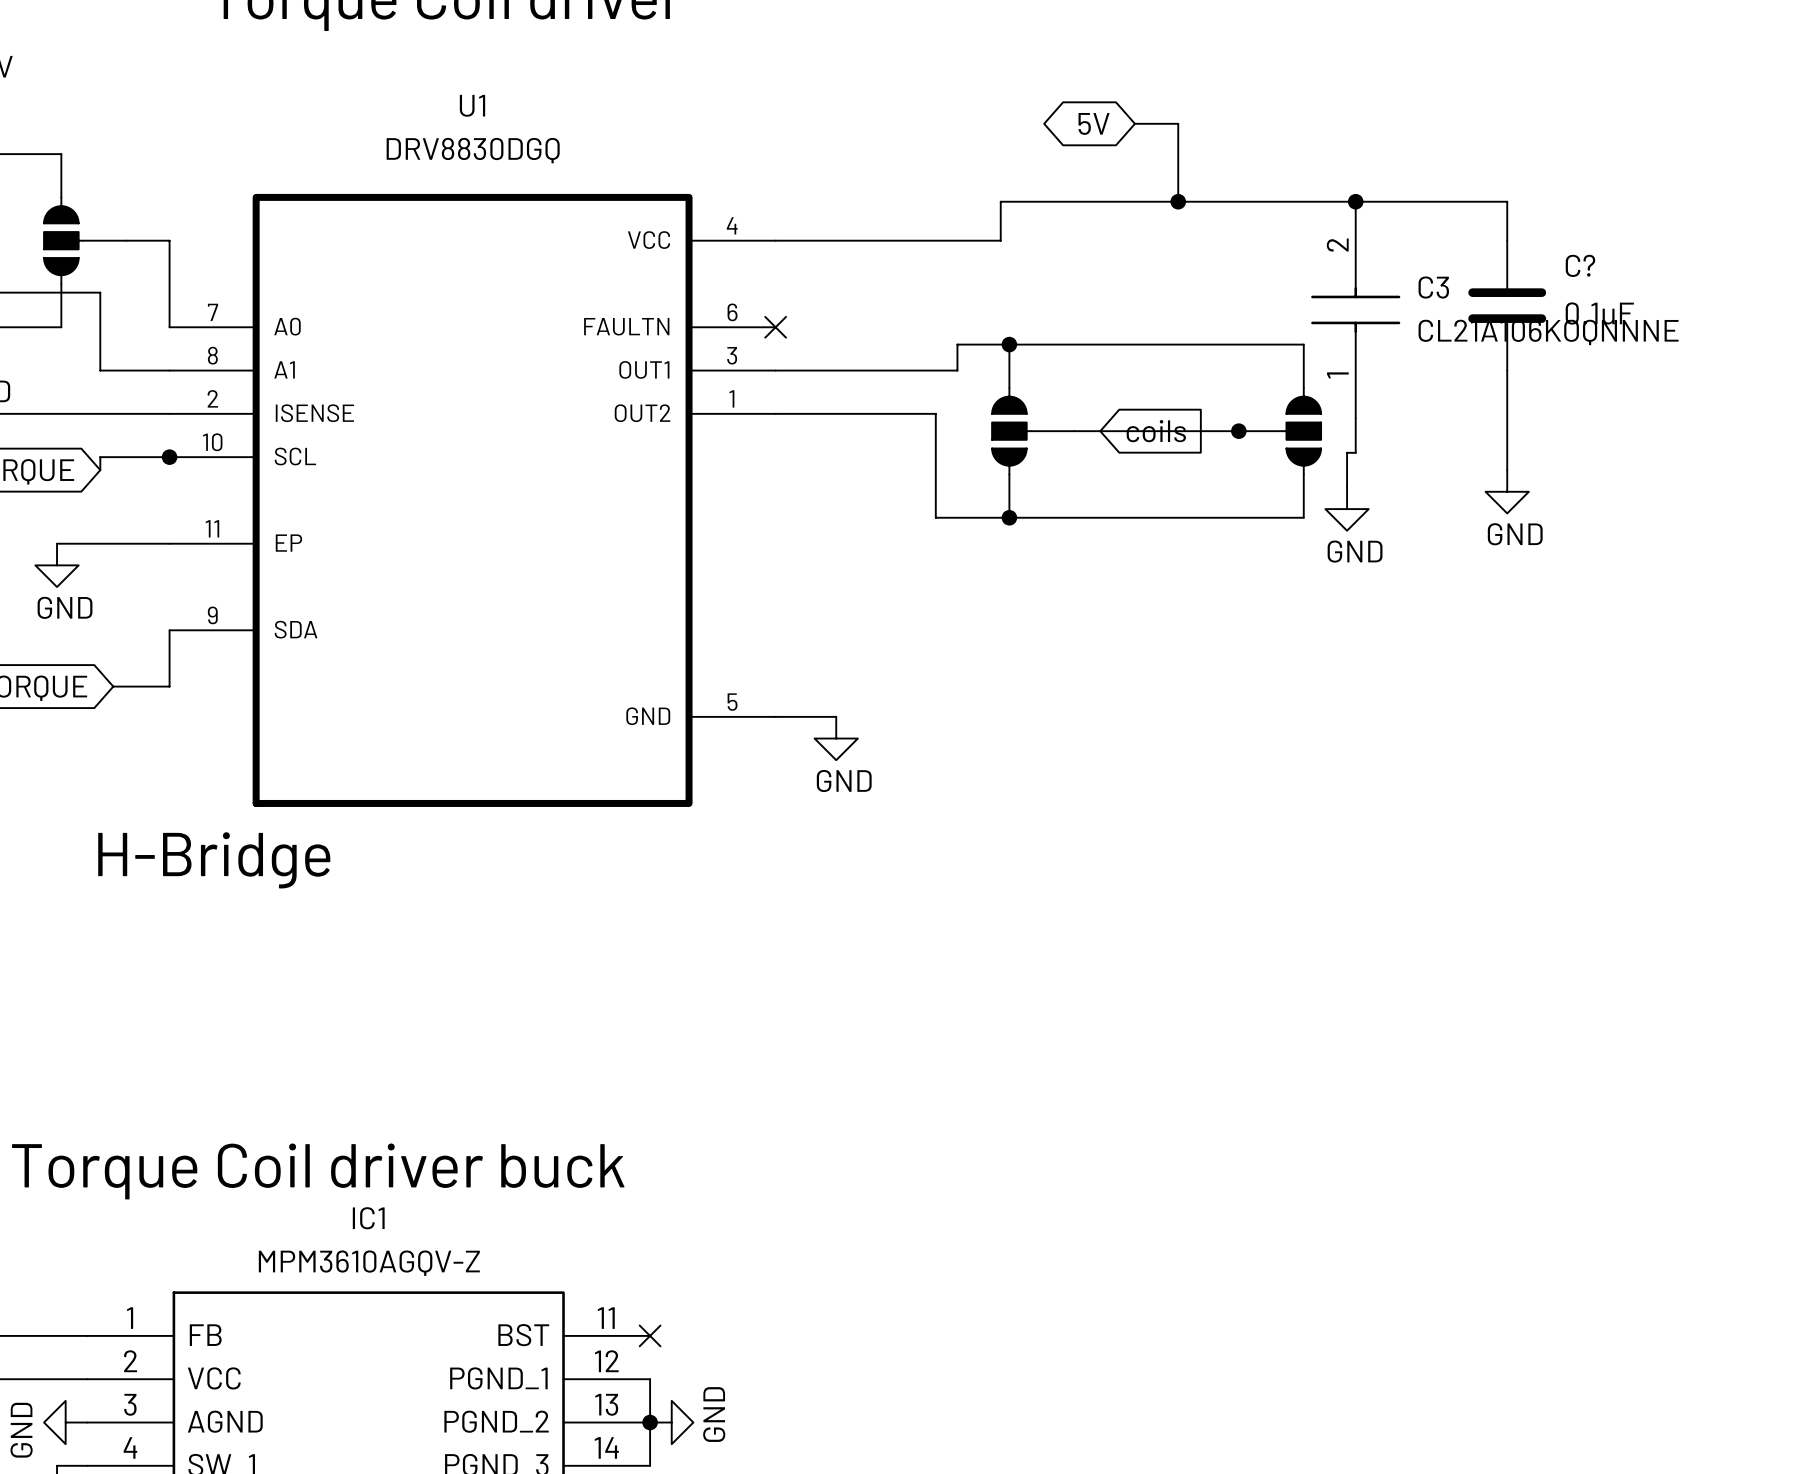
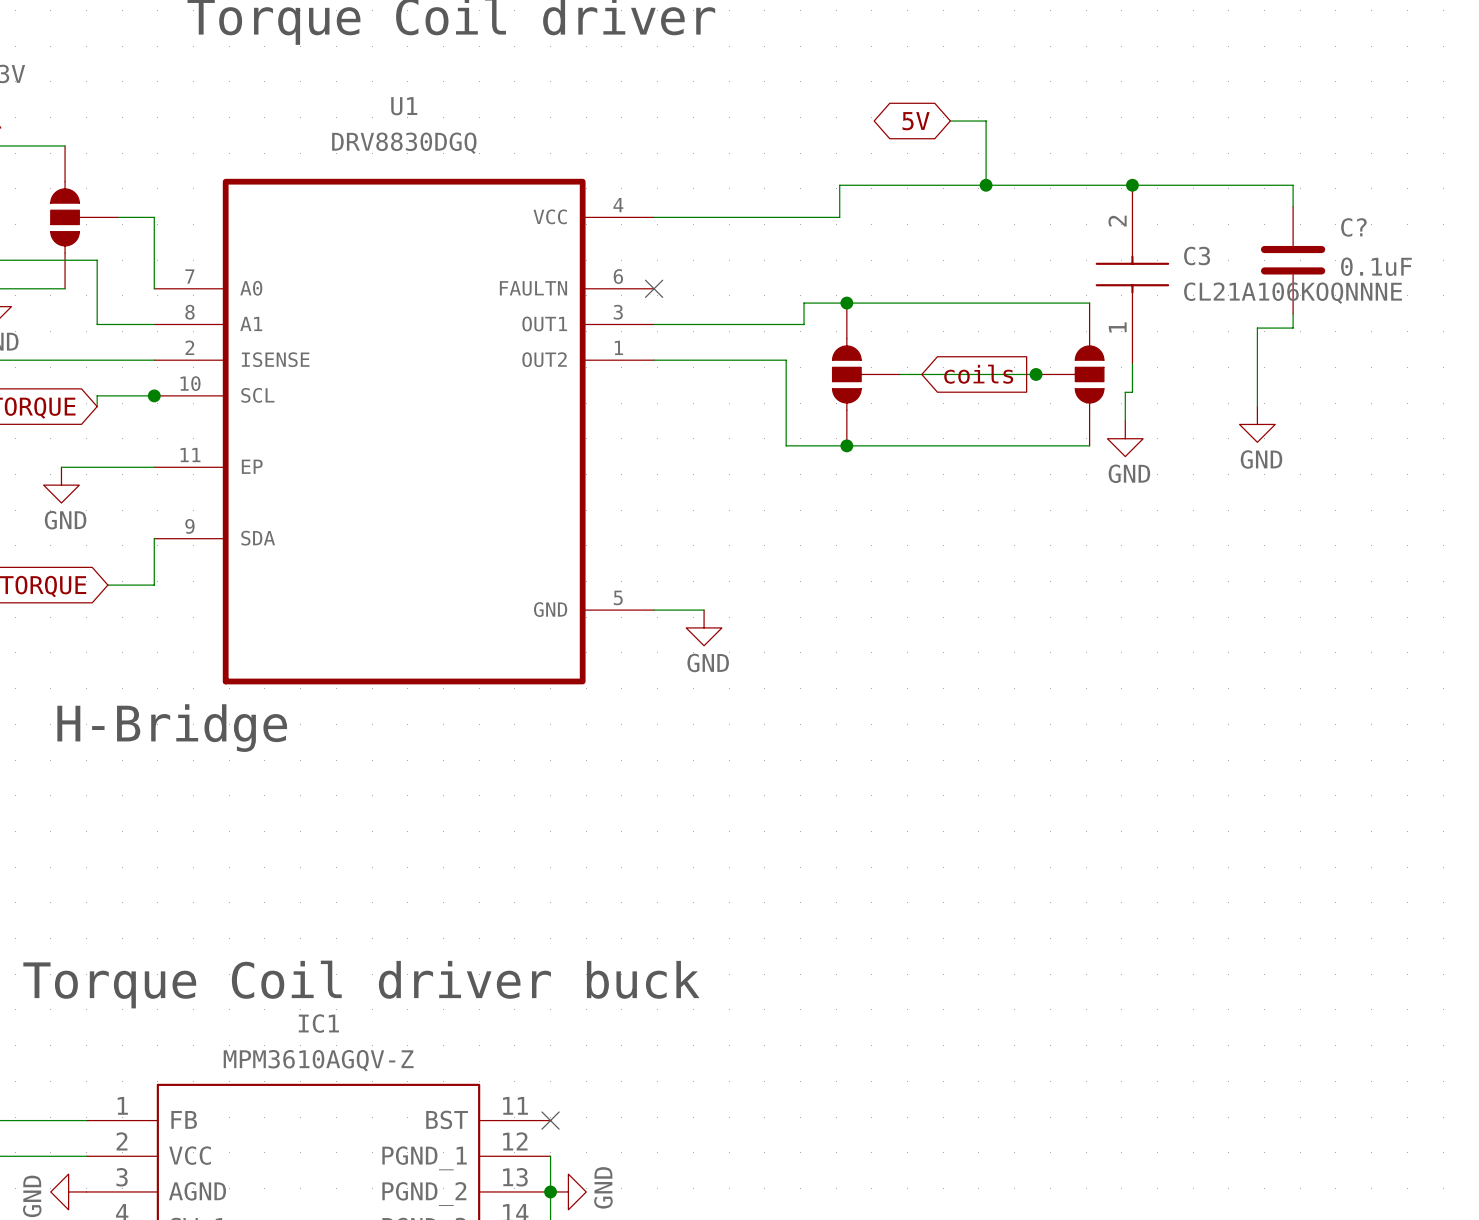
wire: (1507, 201) (1507, 240) -> (1257, 185) (1293, 185) (1293, 206)
C? position: (1507, 305) -> (1293, 260)
wire: (1507, 370) (1507, 374) -> (1293, 313) (1293, 328) (1257, 328)

